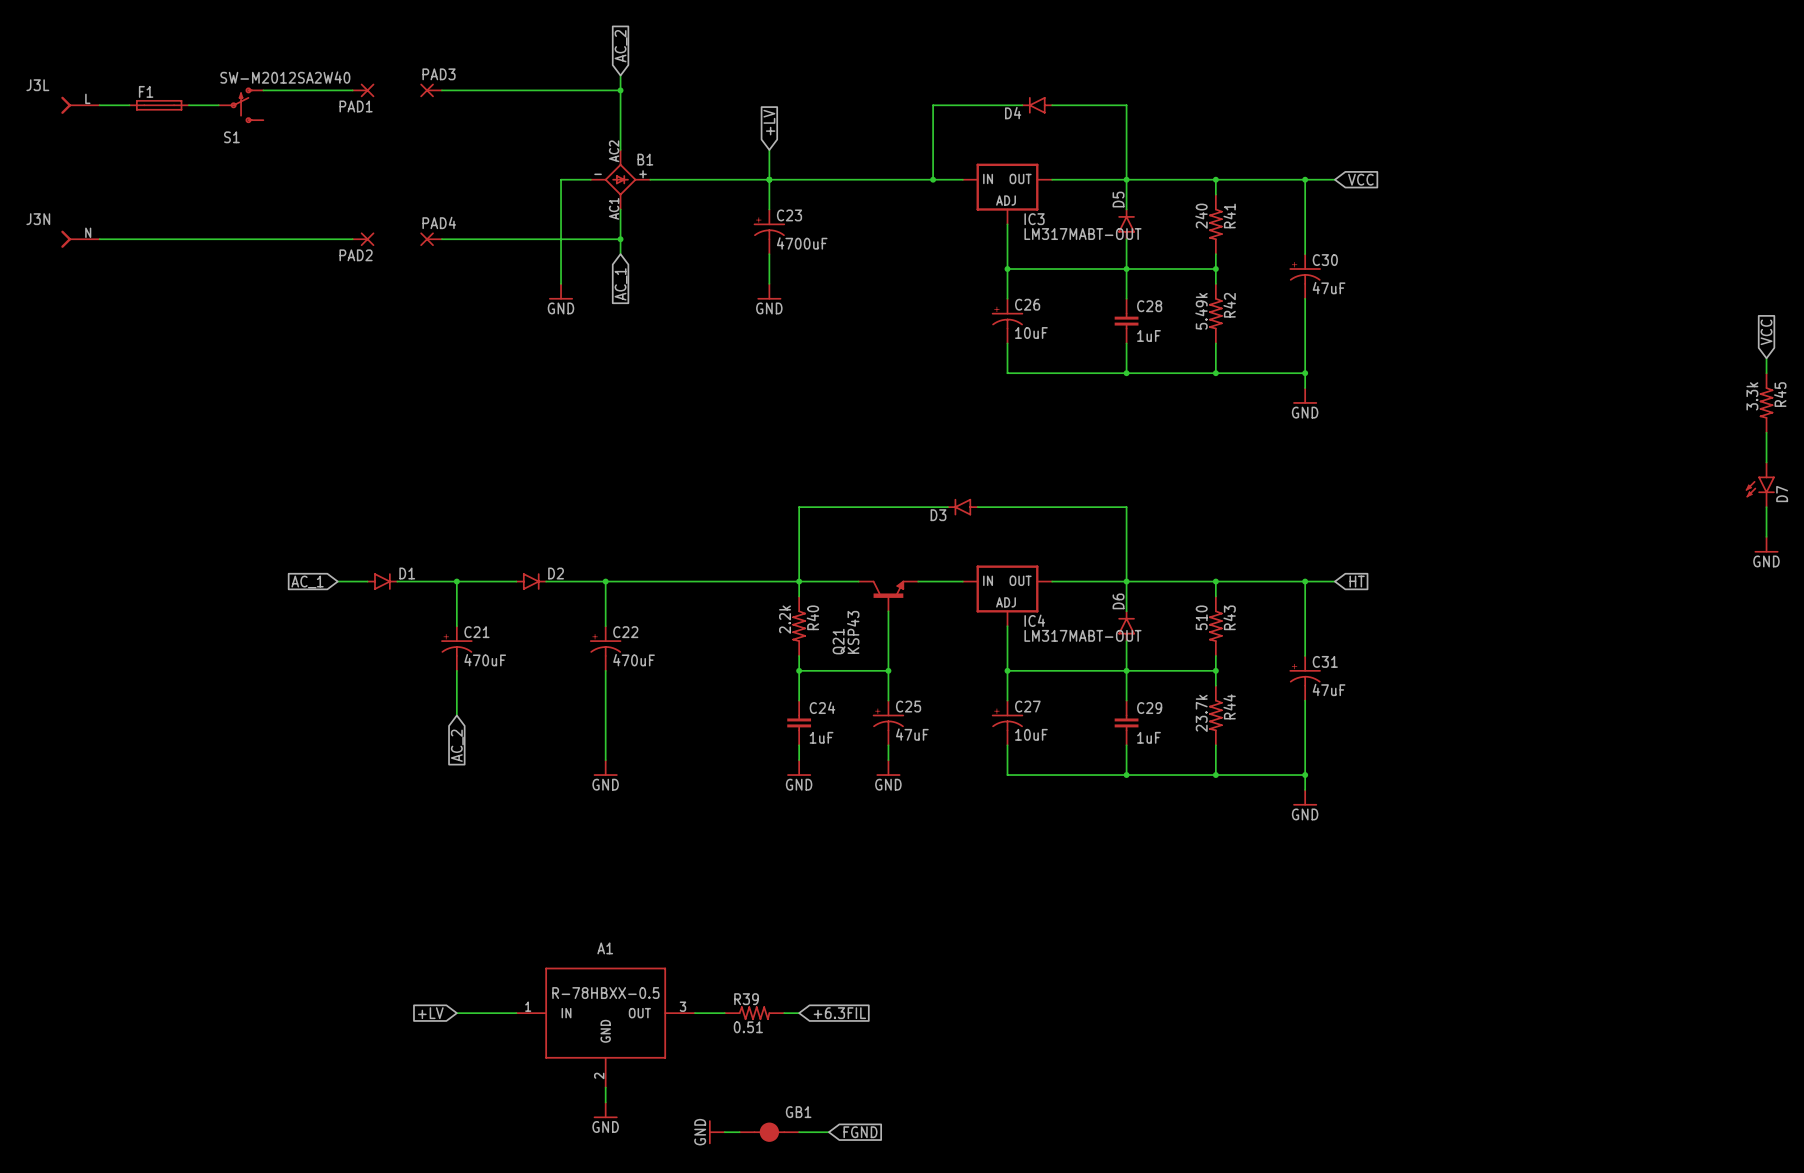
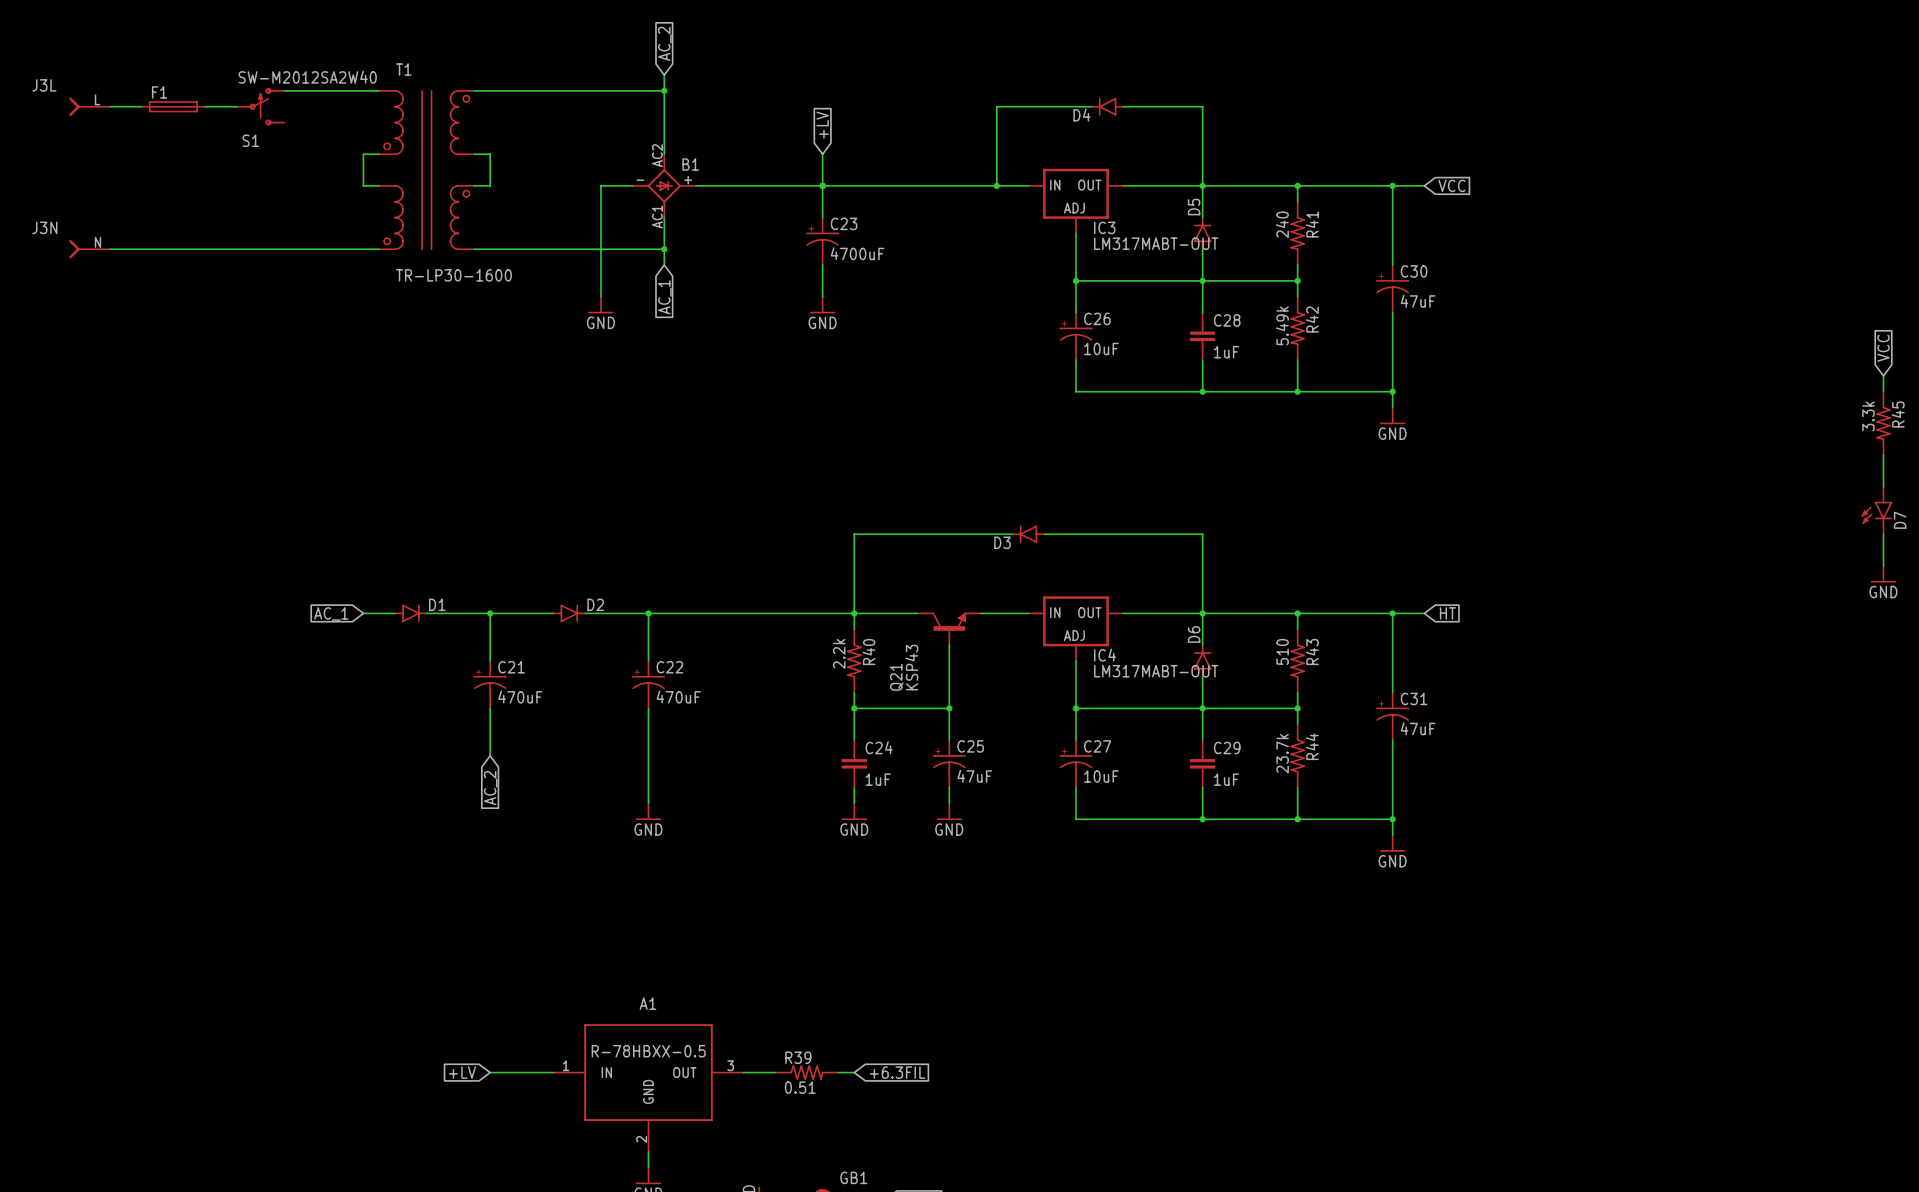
PAD1: (363, 90) -> none
PAD3: (431, 90) -> none
wire: none -> (379, 154) (363, 154) (363, 185) (379, 185)
wire: none -> (474, 154) (490, 154) (490, 185) (474, 185)
T1: none -> TR-LP30-1600 (426, 170)
PAD2: (363, 239) -> none
PAD4: (431, 239) -> none

